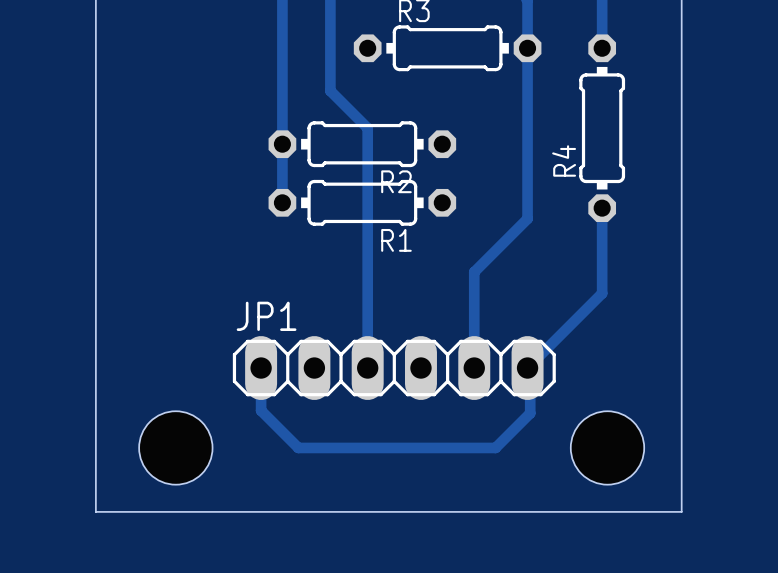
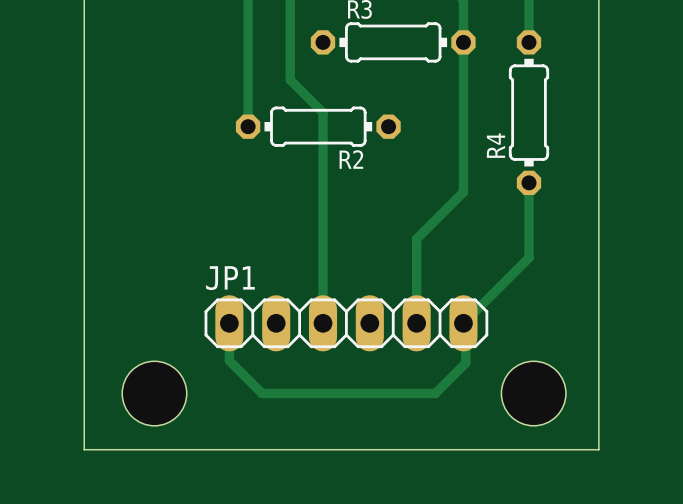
track: (282, 144) (282, 202) -> none
R1: (362, 202) -> none

